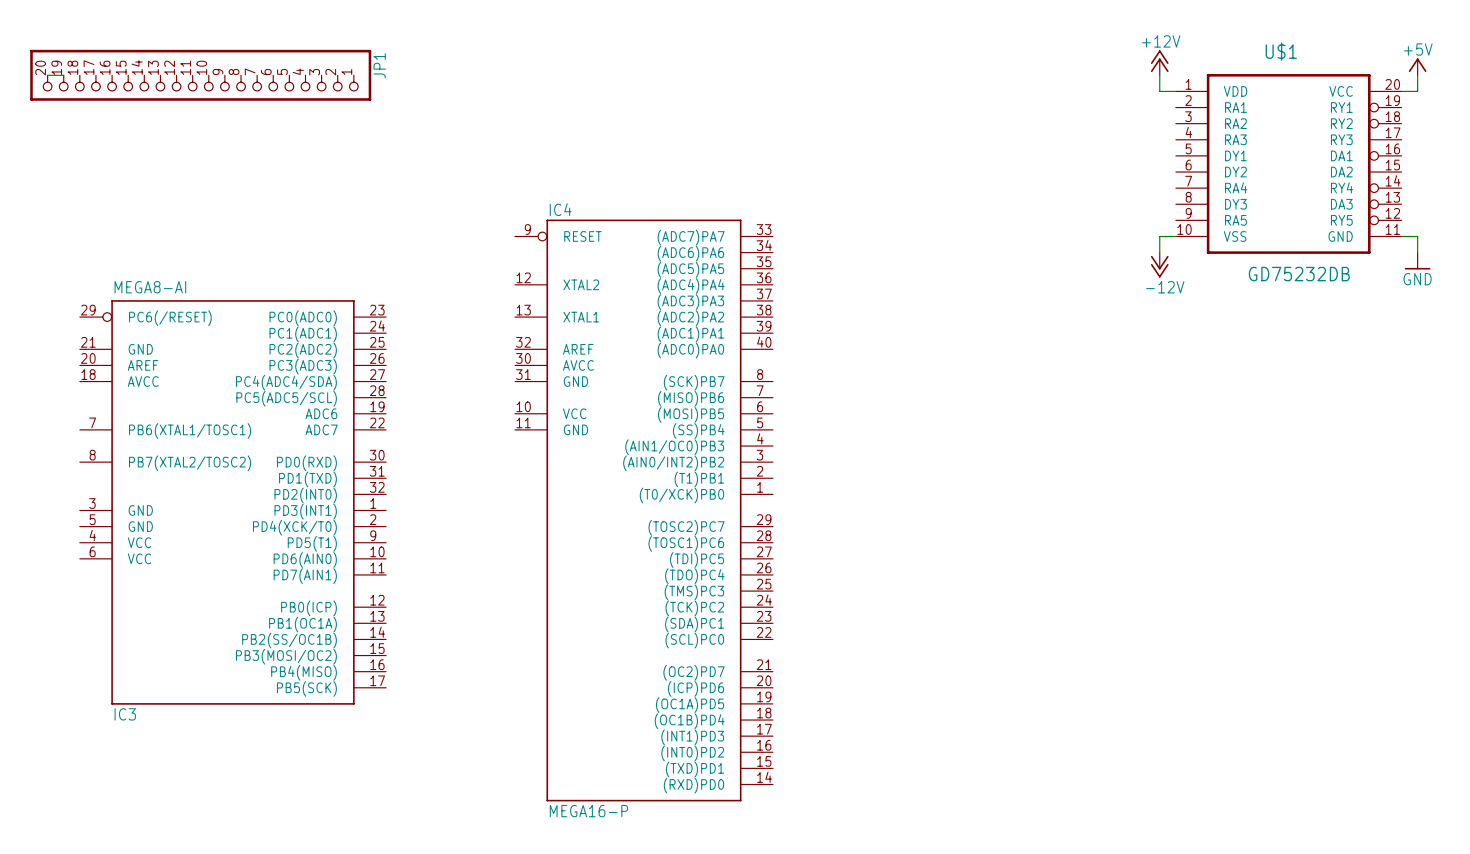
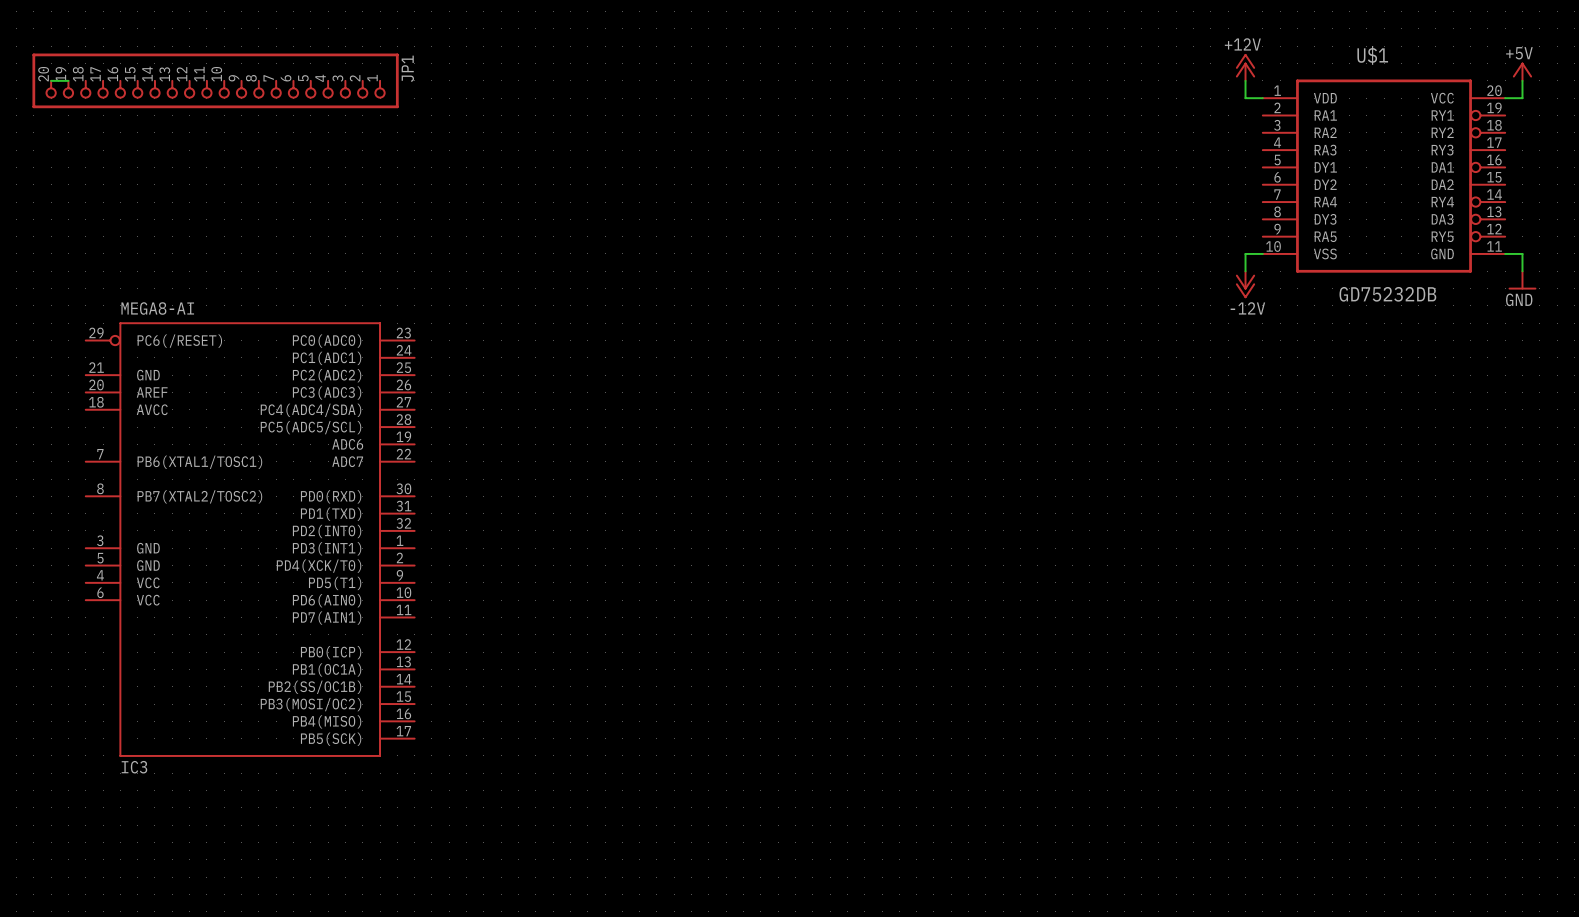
IC4: MEGA16-P (643, 510) -> none

